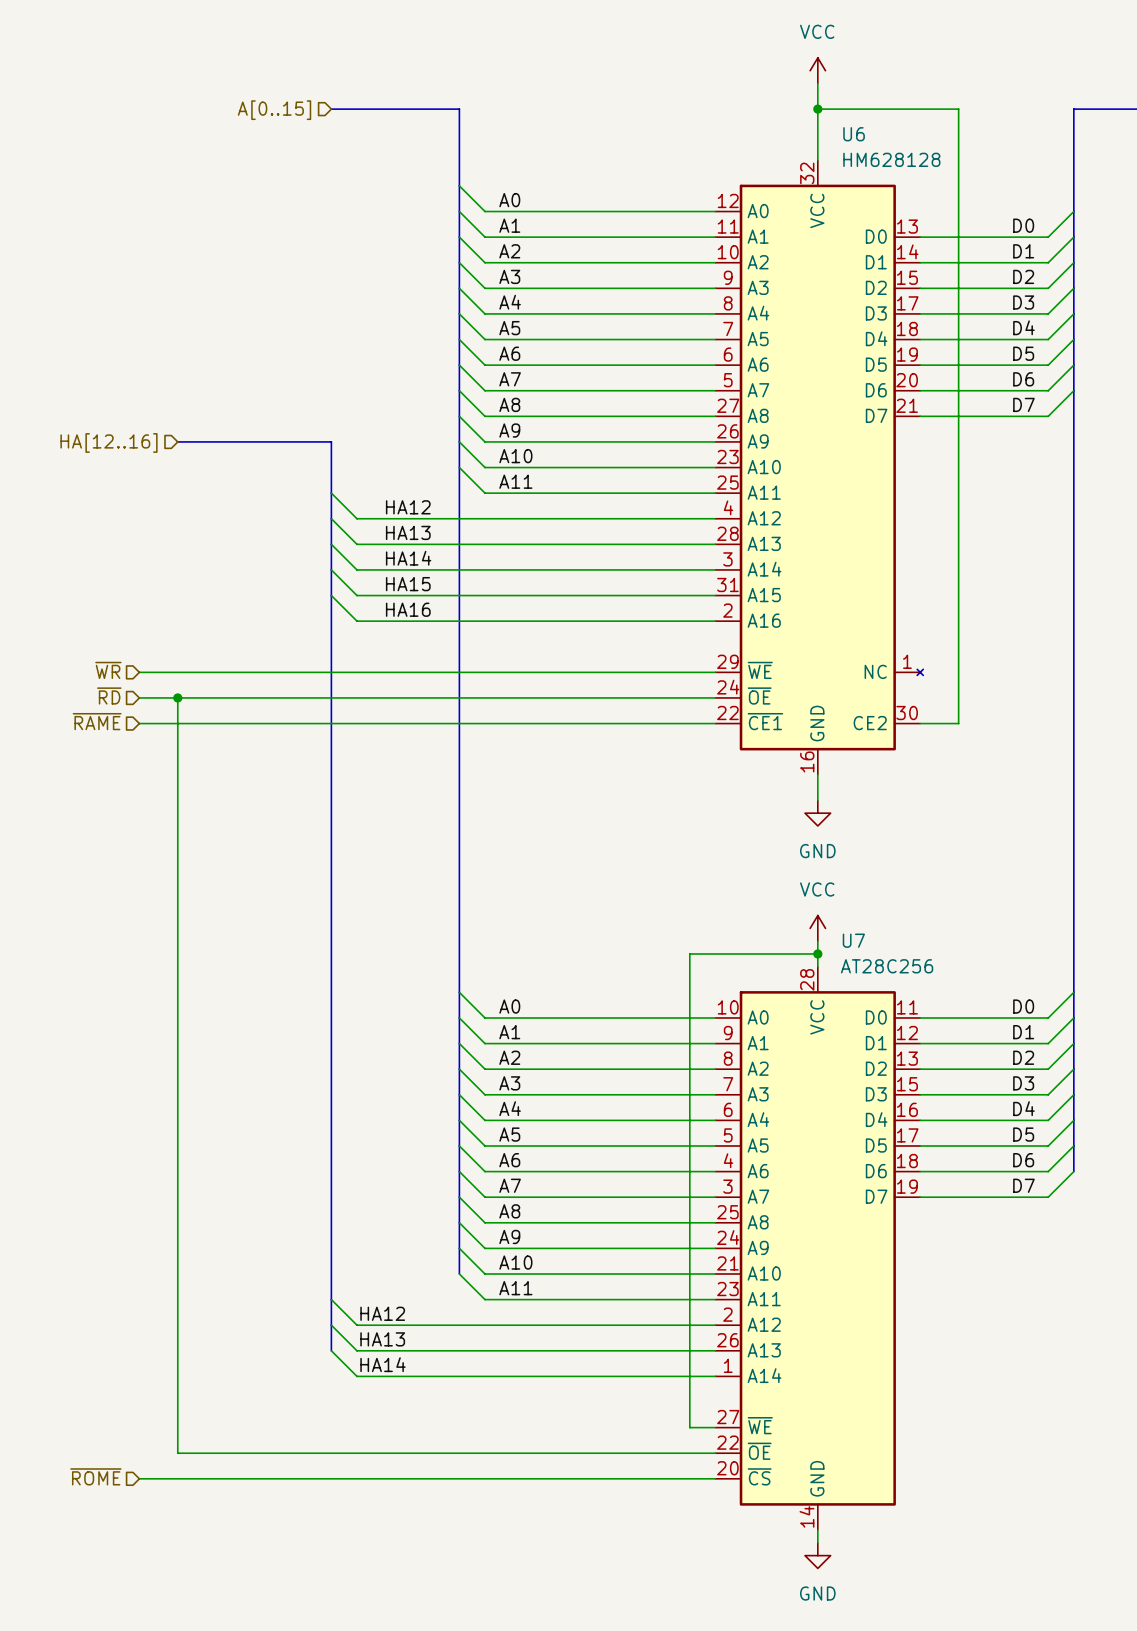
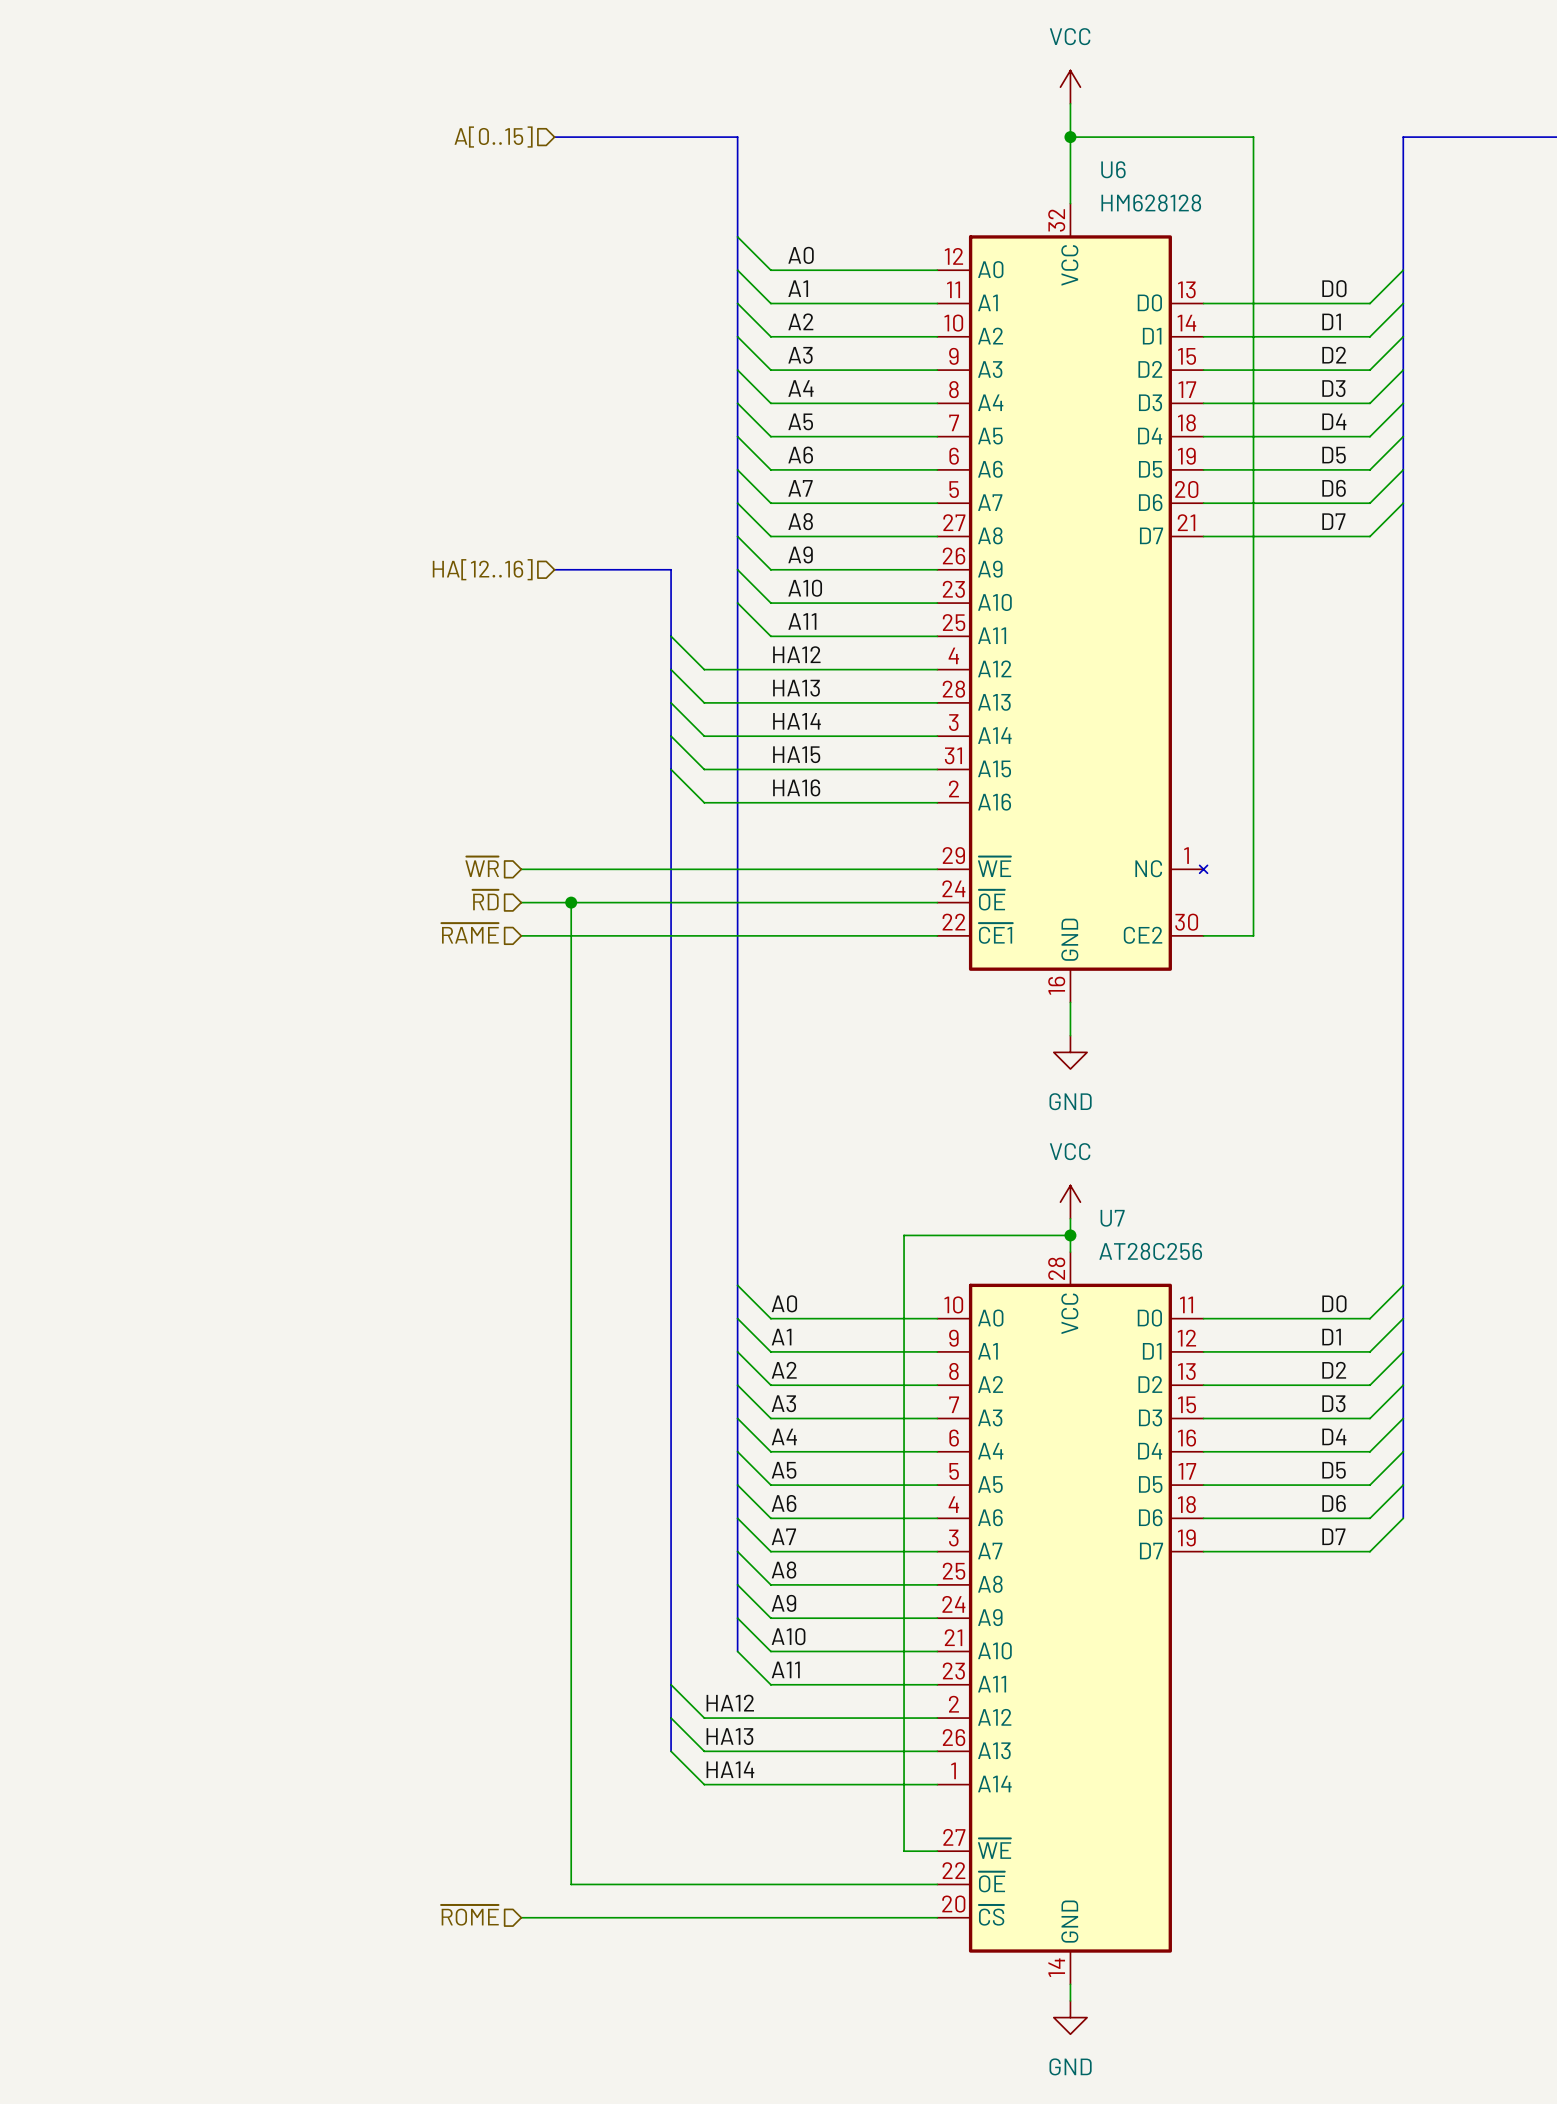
bus: (331, 109) (421, 109) -> none
bus: (459, 109) (459, 1274) -> (604, 137) (737, 137) (737, 1651)
hierarchical label position: A[0..15] (274, 110) -> A[0..15] (493, 137)
wire: (459, 185) (485, 211) (587, 211) -> (737, 236) (770, 270)
label position: A0 (509, 200) -> A0 (801, 255)
wire: (459, 211) (485, 237) (587, 237) -> (737, 270) (770, 303)
label position: A1 (509, 225) -> A1 (798, 288)
wire: (459, 237) (485, 262) (587, 262) -> (737, 303) (770, 336)
label position: A2 (509, 251) -> A2 (800, 321)
wire: (459, 262) (485, 288) (587, 288) -> (737, 336) (770, 370)
label position: A3 (509, 276) -> A3 (800, 355)
wire: (459, 288) (485, 313) (587, 313) -> (737, 370) (770, 403)
label position: A4 (510, 302) -> A4 (800, 388)
wire: (459, 313) (485, 339) (587, 339) -> (737, 403) (770, 436)
label position: A5 (509, 328) -> A5 (800, 421)
wire: (459, 339) (485, 365) (587, 365) -> (737, 436) (770, 469)
label position: A6 (509, 353) -> A6 (800, 455)
wire: (459, 365) (485, 390) (587, 390) -> (737, 469) (770, 503)
label position: A7 (510, 379) -> A7 (800, 488)
wire: (459, 390) (485, 416) (587, 416) -> (737, 503) (770, 536)
label position: A8 (509, 404) -> A8 (800, 521)
wire: (459, 416) (485, 441) (587, 441) -> (737, 536) (770, 569)
label position: A9 (509, 430) -> A9 (800, 554)
bus: (177, 441) (331, 441) (331, 1350) -> none
bus: none -> (554, 569) (671, 569) (671, 1751)
wire: (459, 441) (485, 467) (587, 467) -> (737, 569) (770, 603)
hierarchical label position: HA[12..16] (109, 442) -> HA[12..16] (482, 569)
label position: A10 (515, 456) -> A10 (805, 588)
wire: (459, 467) (485, 493) (587, 493) -> (737, 603) (770, 636)
label position: A11 (515, 481) -> A11 (802, 621)
wire: (331, 493) (356, 518) (536, 518) -> (671, 636) (704, 669)
label position: HA12 (408, 507) -> HA12 (796, 654)
wire: (331, 518) (356, 544) (536, 544) -> (671, 669) (704, 702)
label position: HA13 (408, 532) -> HA13 (796, 688)
wire: (331, 544) (356, 569) (536, 569) -> (671, 702) (704, 736)
label position: HA14 (408, 558) -> HA14 (796, 721)
wire: (331, 569) (356, 595) (536, 595) -> (671, 736) (704, 769)
label position: HA15 (408, 584) -> HA15 (796, 754)
wire: (331, 595) (356, 621) (536, 621) -> (671, 769) (704, 802)
label position: HA16 (408, 609) -> HA16 (796, 787)
hierarchical label: ~{WR} (108, 670) -> none
hierarchical label: none -> ~{WR} (482, 866)
wire: (139, 672) (395, 672) -> none
hierarchical label: ~{RD} (109, 696) -> none
hierarchical label: none -> ~{RD} (485, 900)
wire: (139, 697) (395, 697) -> none
wire: (177, 697) (177, 1453) (433, 1453) -> (571, 902) (571, 1884)
junction: (177, 697) -> none
junction: none -> (571, 902)
hierarchical label: ~{RAME} (97, 721) -> none
hierarchical label: none -> ~{RAME} (470, 933)
wire: (139, 723) (395, 723) -> none
wire: (459, 992) (485, 1017) (587, 1017) -> (737, 1285) (770, 1318)
label position: A0 (509, 1006) -> A0 (784, 1303)
wire: (459, 1017) (485, 1043) (587, 1043) -> (737, 1318) (770, 1351)
label position: A1 (509, 1032) -> A1 (781, 1337)
wire: (459, 1043) (485, 1069) (587, 1069) -> (737, 1351) (770, 1385)
label position: A2 (509, 1057) -> A2 (784, 1370)
wire: (459, 1069) (485, 1094) (587, 1094) -> (737, 1385) (770, 1418)
label position: A3 (509, 1083) -> A3 (783, 1403)
wire: (459, 1094) (485, 1120) (587, 1120) -> (737, 1418) (770, 1451)
label position: A4 (510, 1108) -> A4 (784, 1436)
wire: (459, 1120) (485, 1145) (587, 1145) -> (737, 1451) (770, 1485)
label position: A5 (509, 1134) -> A5 (784, 1470)
wire: (459, 1145) (485, 1171) (587, 1171) -> (737, 1485) (770, 1518)
label position: A6 (509, 1160) -> A6 (784, 1503)
wire: (459, 1171) (485, 1197) (587, 1197) -> (737, 1518) (770, 1551)
label position: A7 (510, 1185) -> A7 (783, 1536)
wire: (459, 1197) (485, 1222) (587, 1222) -> (737, 1551) (770, 1584)
label position: A8 (509, 1211) -> A8 (783, 1570)
wire: (459, 1222) (485, 1248) (587, 1248) -> (737, 1584) (770, 1618)
label position: A9 (509, 1236) -> A9 (783, 1603)
wire: (459, 1248) (485, 1274) (587, 1274) -> (737, 1618) (770, 1651)
label position: A10 (515, 1262) -> A10 (788, 1636)
wire: (459, 1274) (485, 1299) (587, 1299) -> (737, 1651) (770, 1684)
label position: A11 (515, 1288) -> A11 (785, 1669)
wire: (331, 1299) (356, 1325) (536, 1325) -> (671, 1684) (704, 1718)
label position: HA12 (382, 1313) -> HA12 (730, 1703)
wire: (331, 1325) (356, 1350) (536, 1350) -> (671, 1718) (704, 1751)
label position: HA13 (382, 1339) -> HA13 (729, 1736)
wire: (331, 1350) (356, 1376) (536, 1376) -> (671, 1751) (704, 1784)
label position: HA14 (382, 1364) -> HA14 (730, 1769)
hierarchical label: ~{ROME} (95, 1476) -> none
hierarchical label: none -> ~{ROME} (469, 1915)
wire: (139, 1478) (395, 1478) -> none

